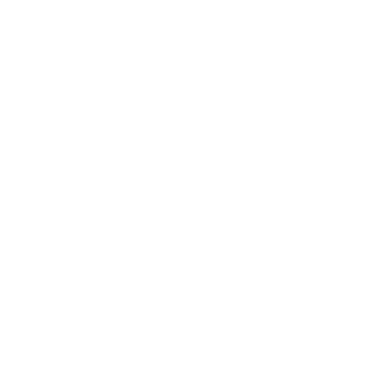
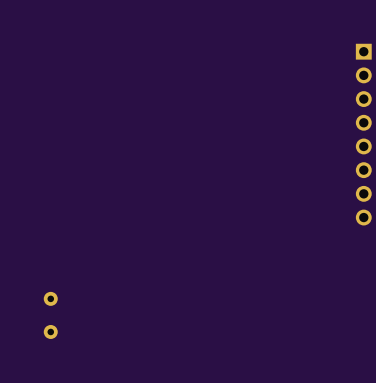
part: none -> (363, 134)
part: none -> (50, 298)
part: none -> (50, 331)

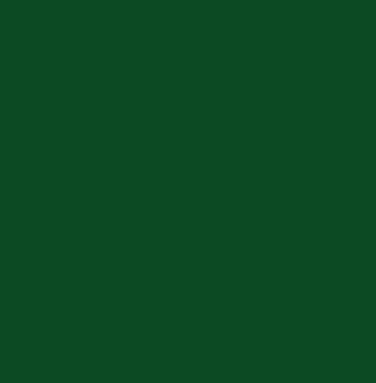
part: (363, 134) -> none
part: (50, 298) -> none
part: (50, 331) -> none

